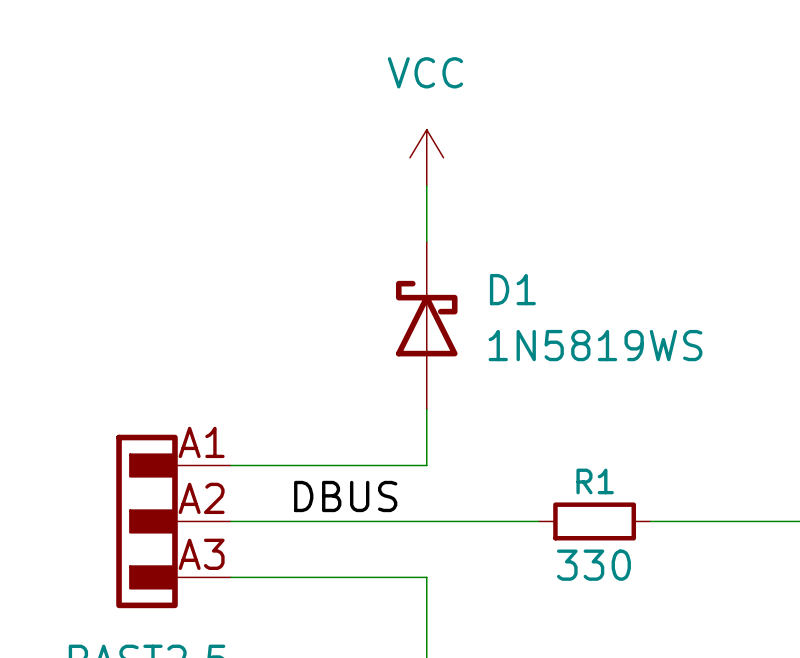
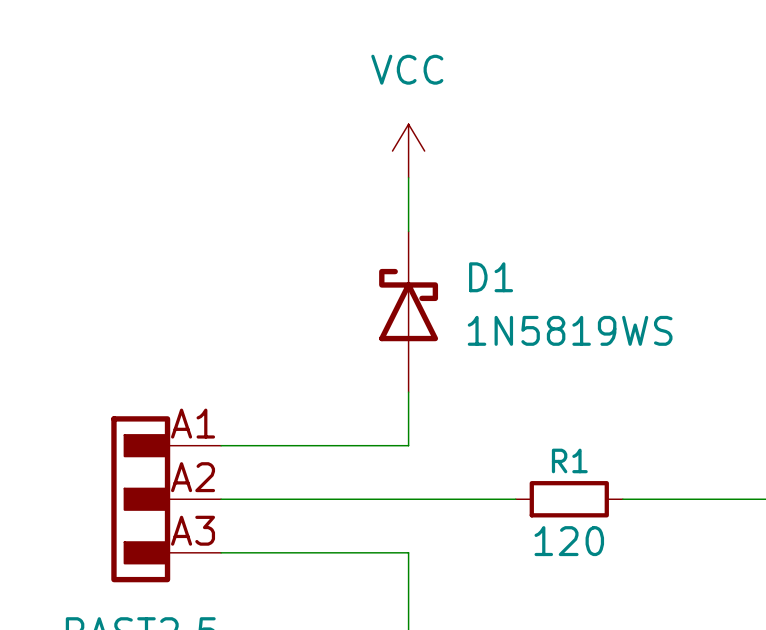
label: DBUS (345, 496) -> none
R1 value: 330 (593, 565) -> 120 (569, 541)

